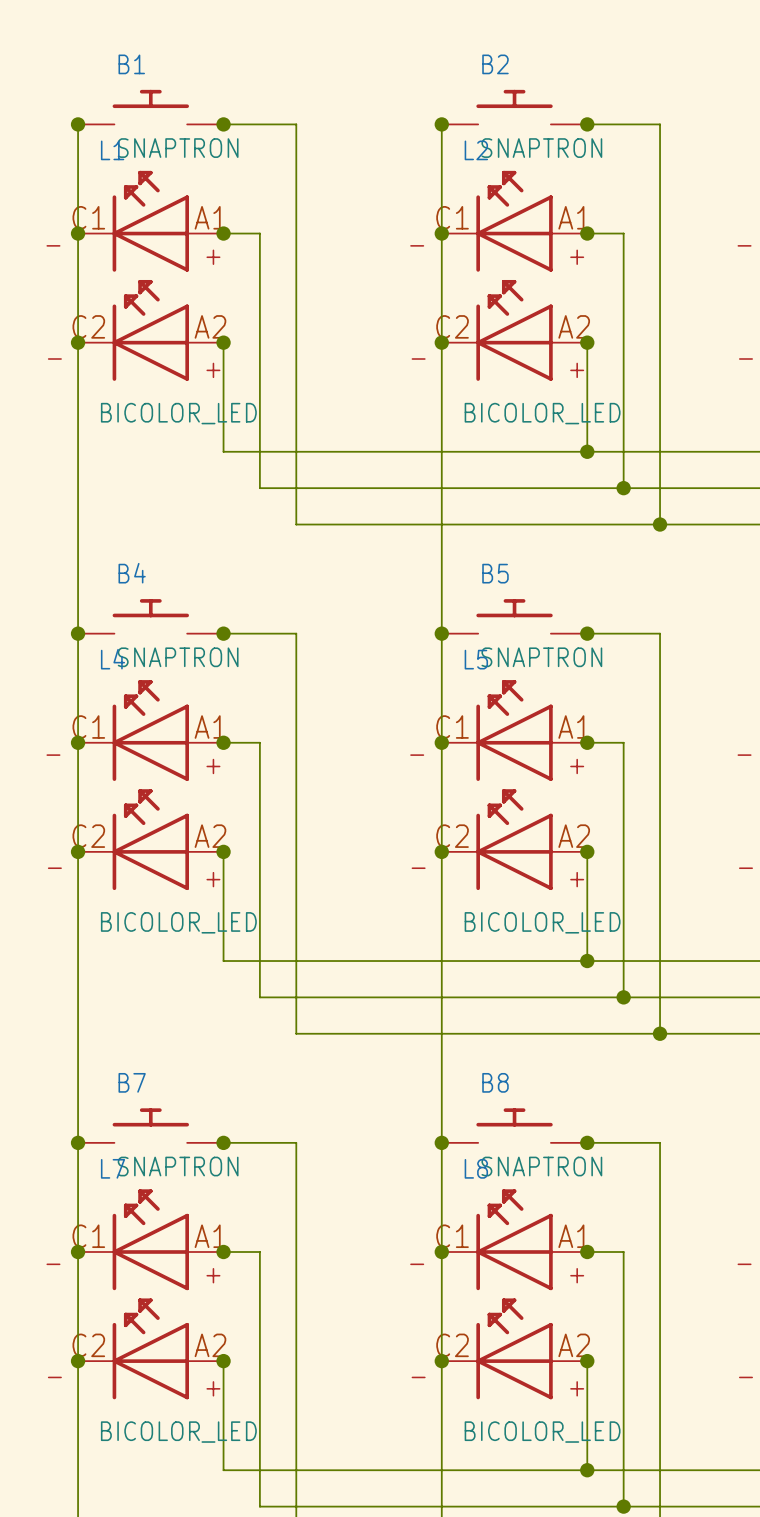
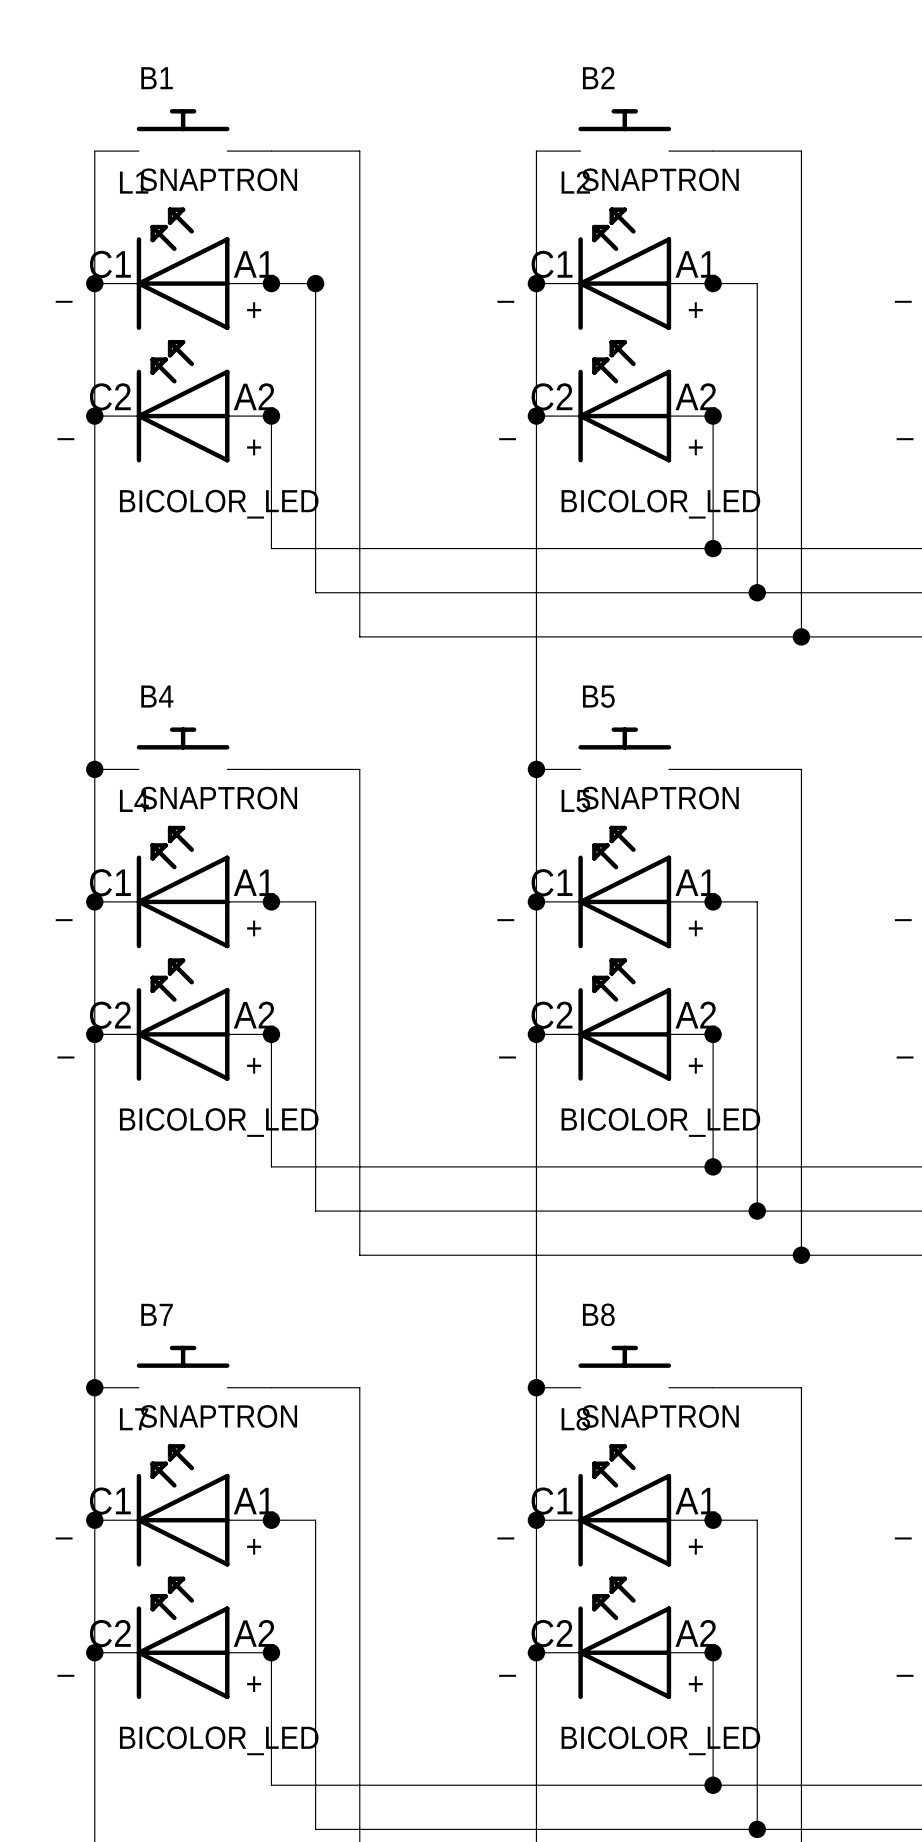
junction: (78, 124) -> none
junction: (223, 124) -> none
junction: (441, 124) -> none
junction: (587, 124) -> none
junction: none -> (315, 283)
junction: (223, 633) -> none
junction: (587, 633) -> none
junction: (223, 1142) -> none
junction: (587, 1142) -> none

